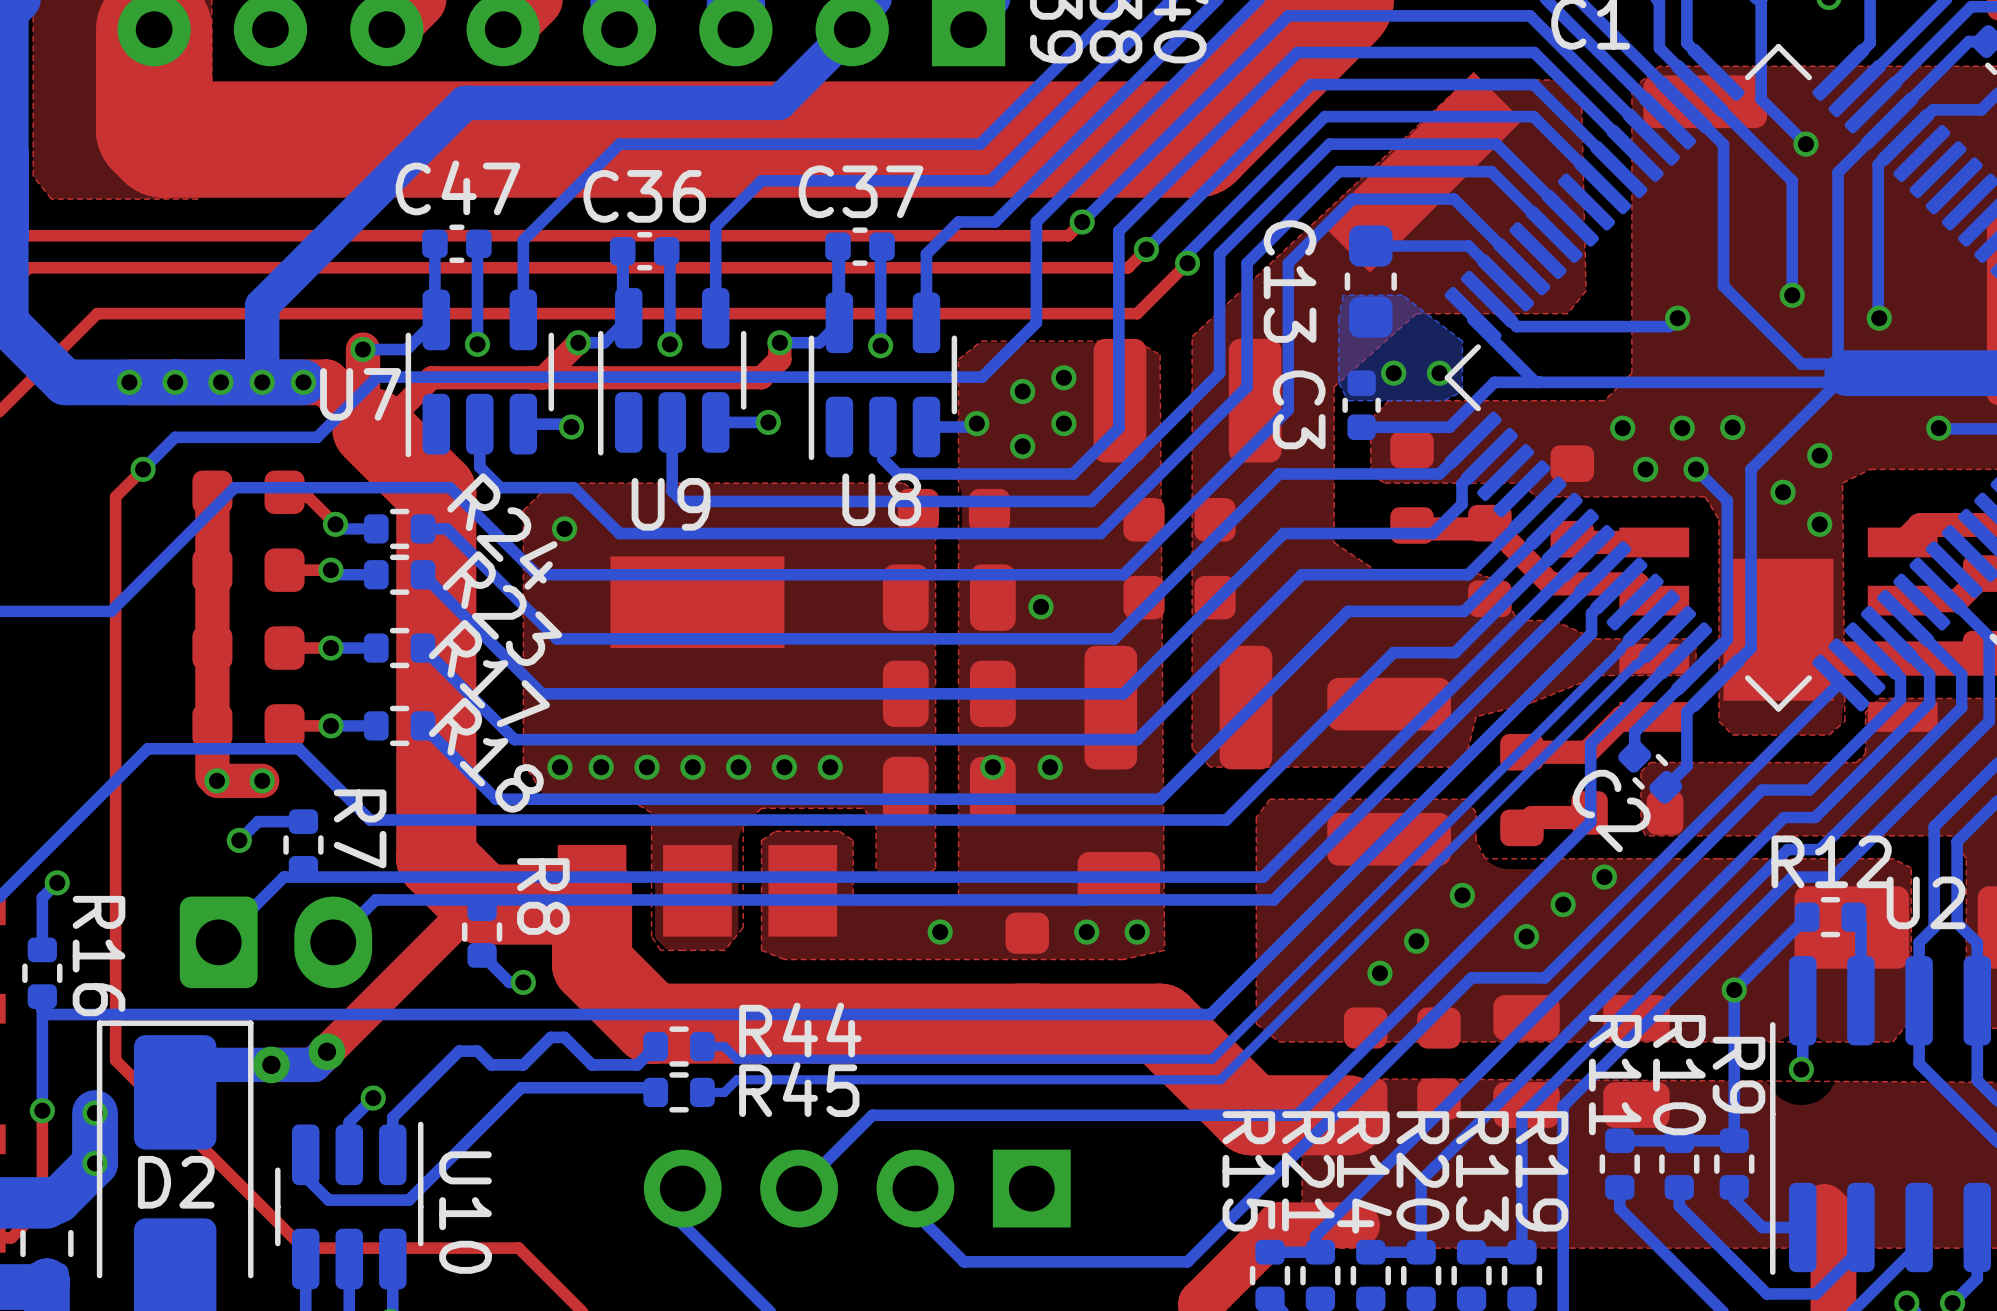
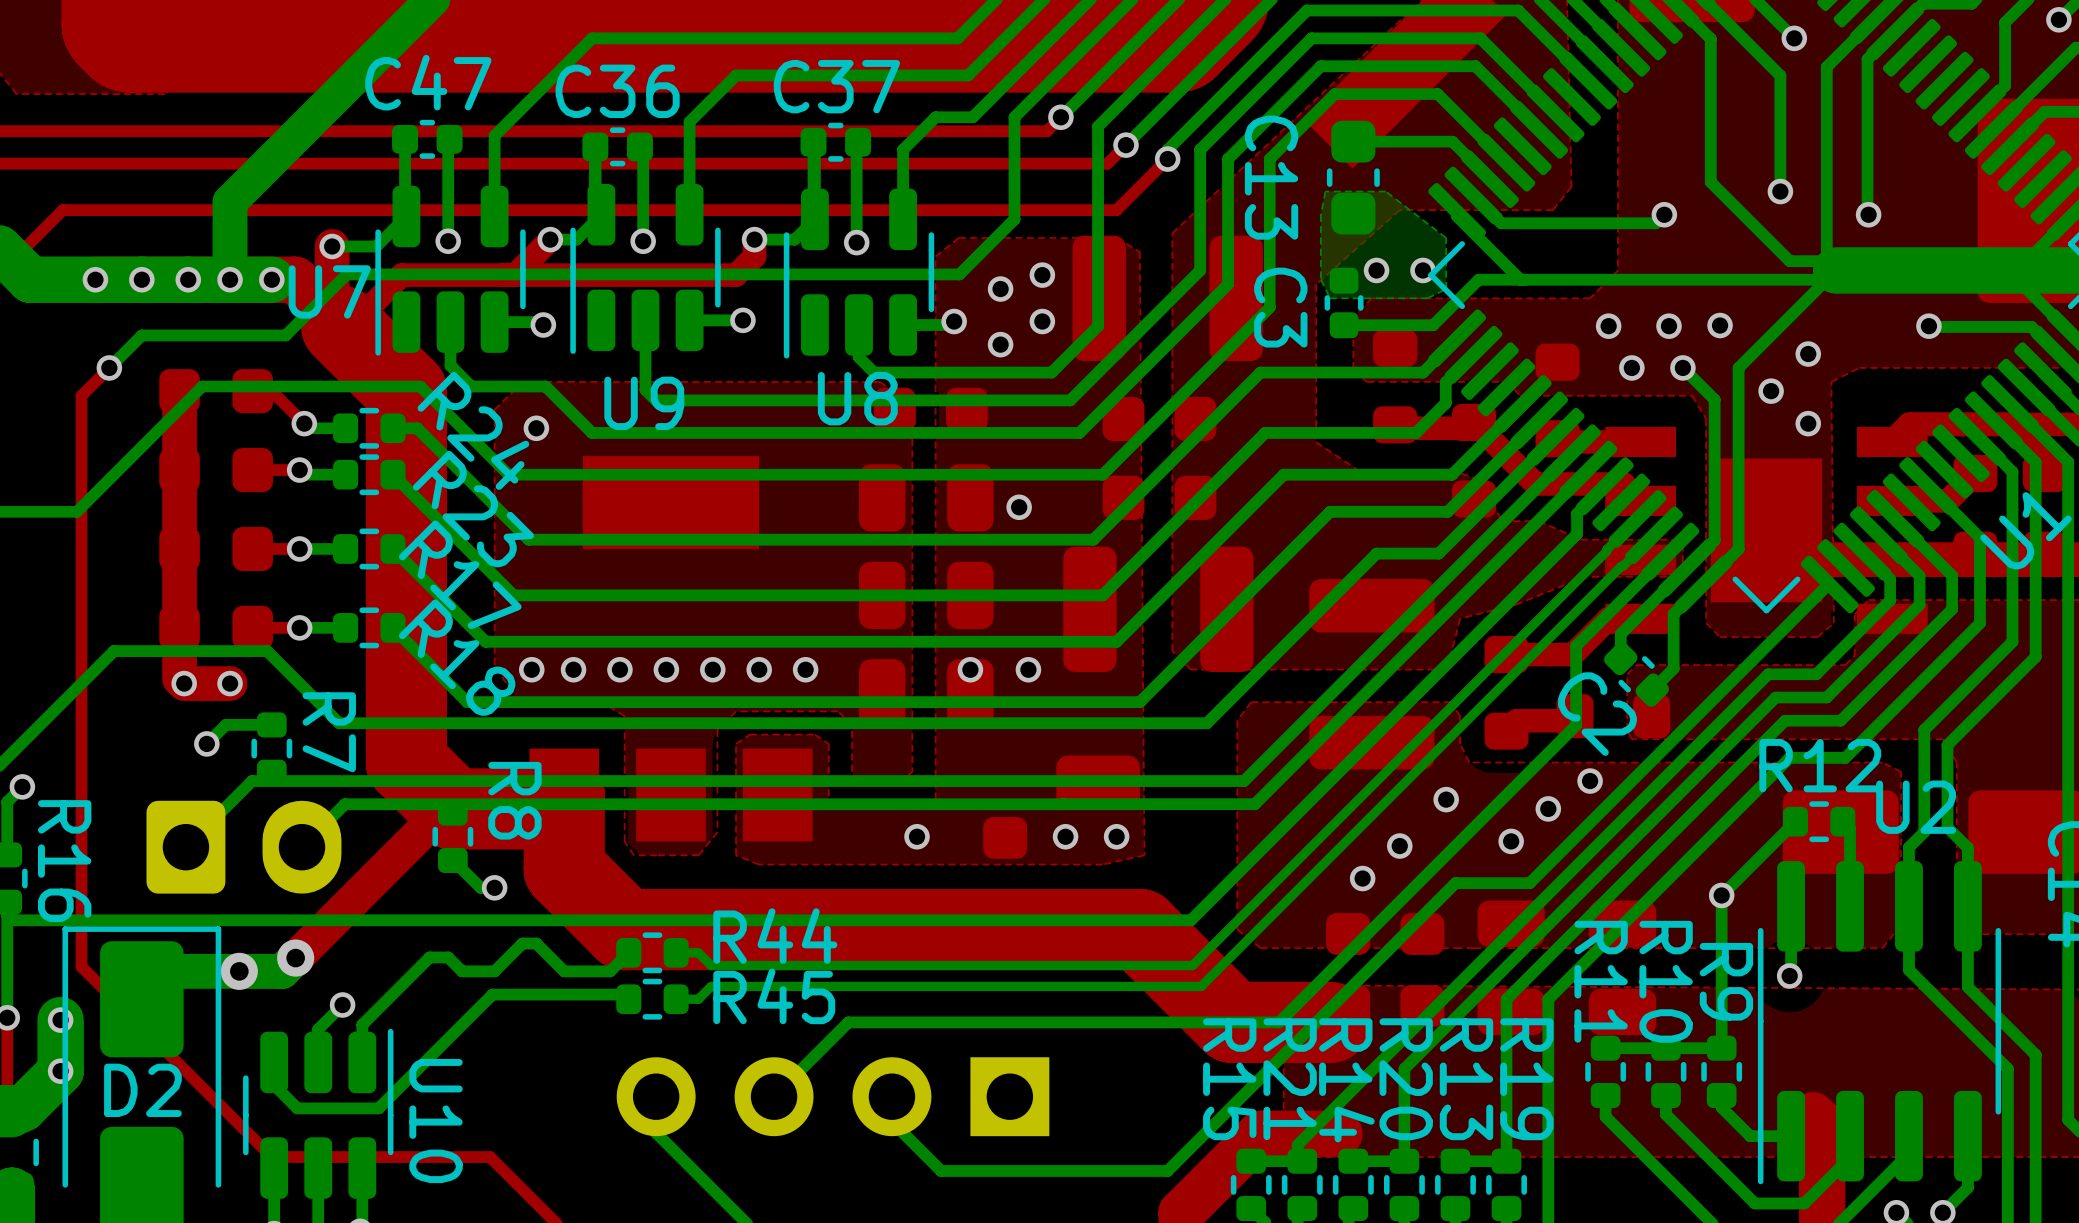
bottom track: (1827, 771) (1809, 790) (1761, 790) -> (1816, 674) (1768, 674) (1749, 692)
bottom track: (1838, 794) (1815, 817) -> (1840, 720) (1803, 720)
bottom track: (1796, 817) (1784, 817) (1421, 1180) -> (1826, 697) (1775, 697) (1404, 1068) (1404, 1088)
bottom track: (1851, 817) (1819, 849) (1787, 849) (1521, 1115) -> (1785, 720) (1506, 999) (1506, 1022)
bottom track: (1856, 854) (1833, 877) (1792, 877) (1563, 1106) -> (1845, 757) (1789, 757) (1548, 999) (1548, 1013)

